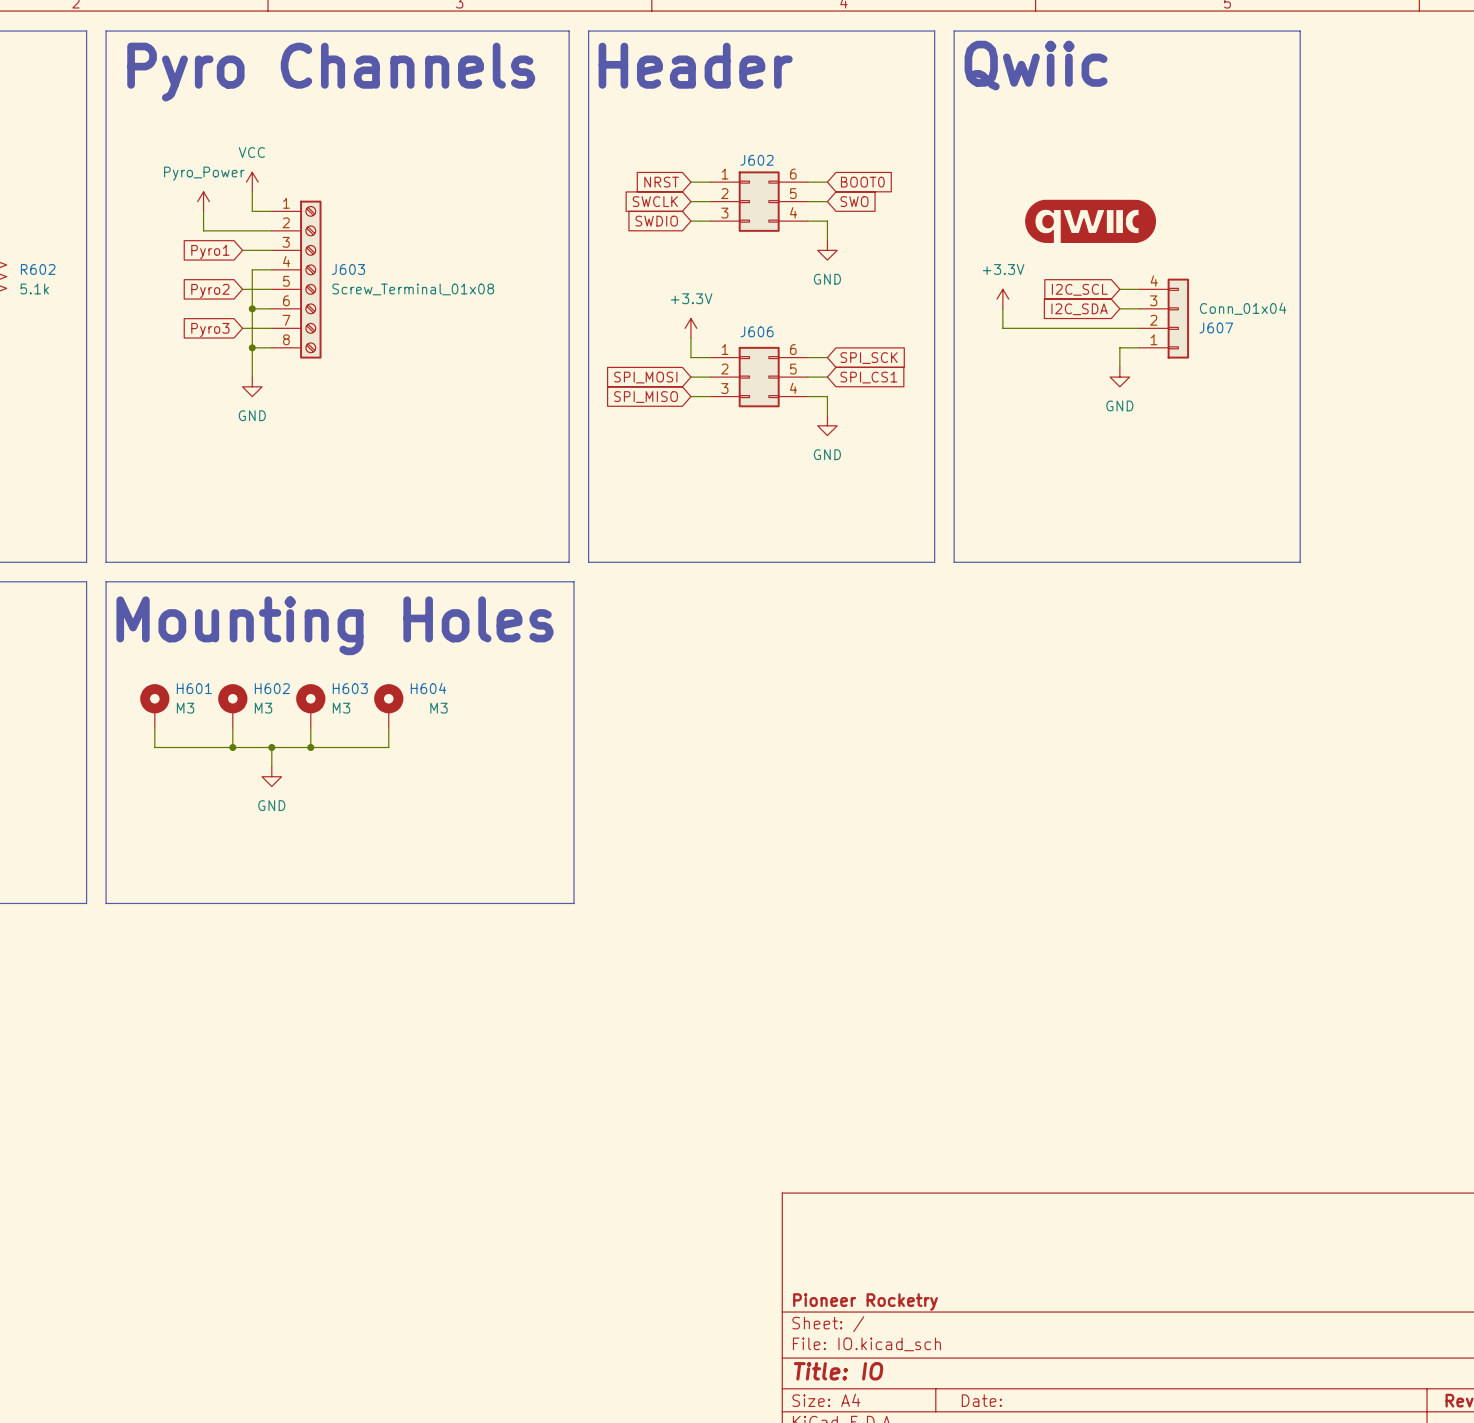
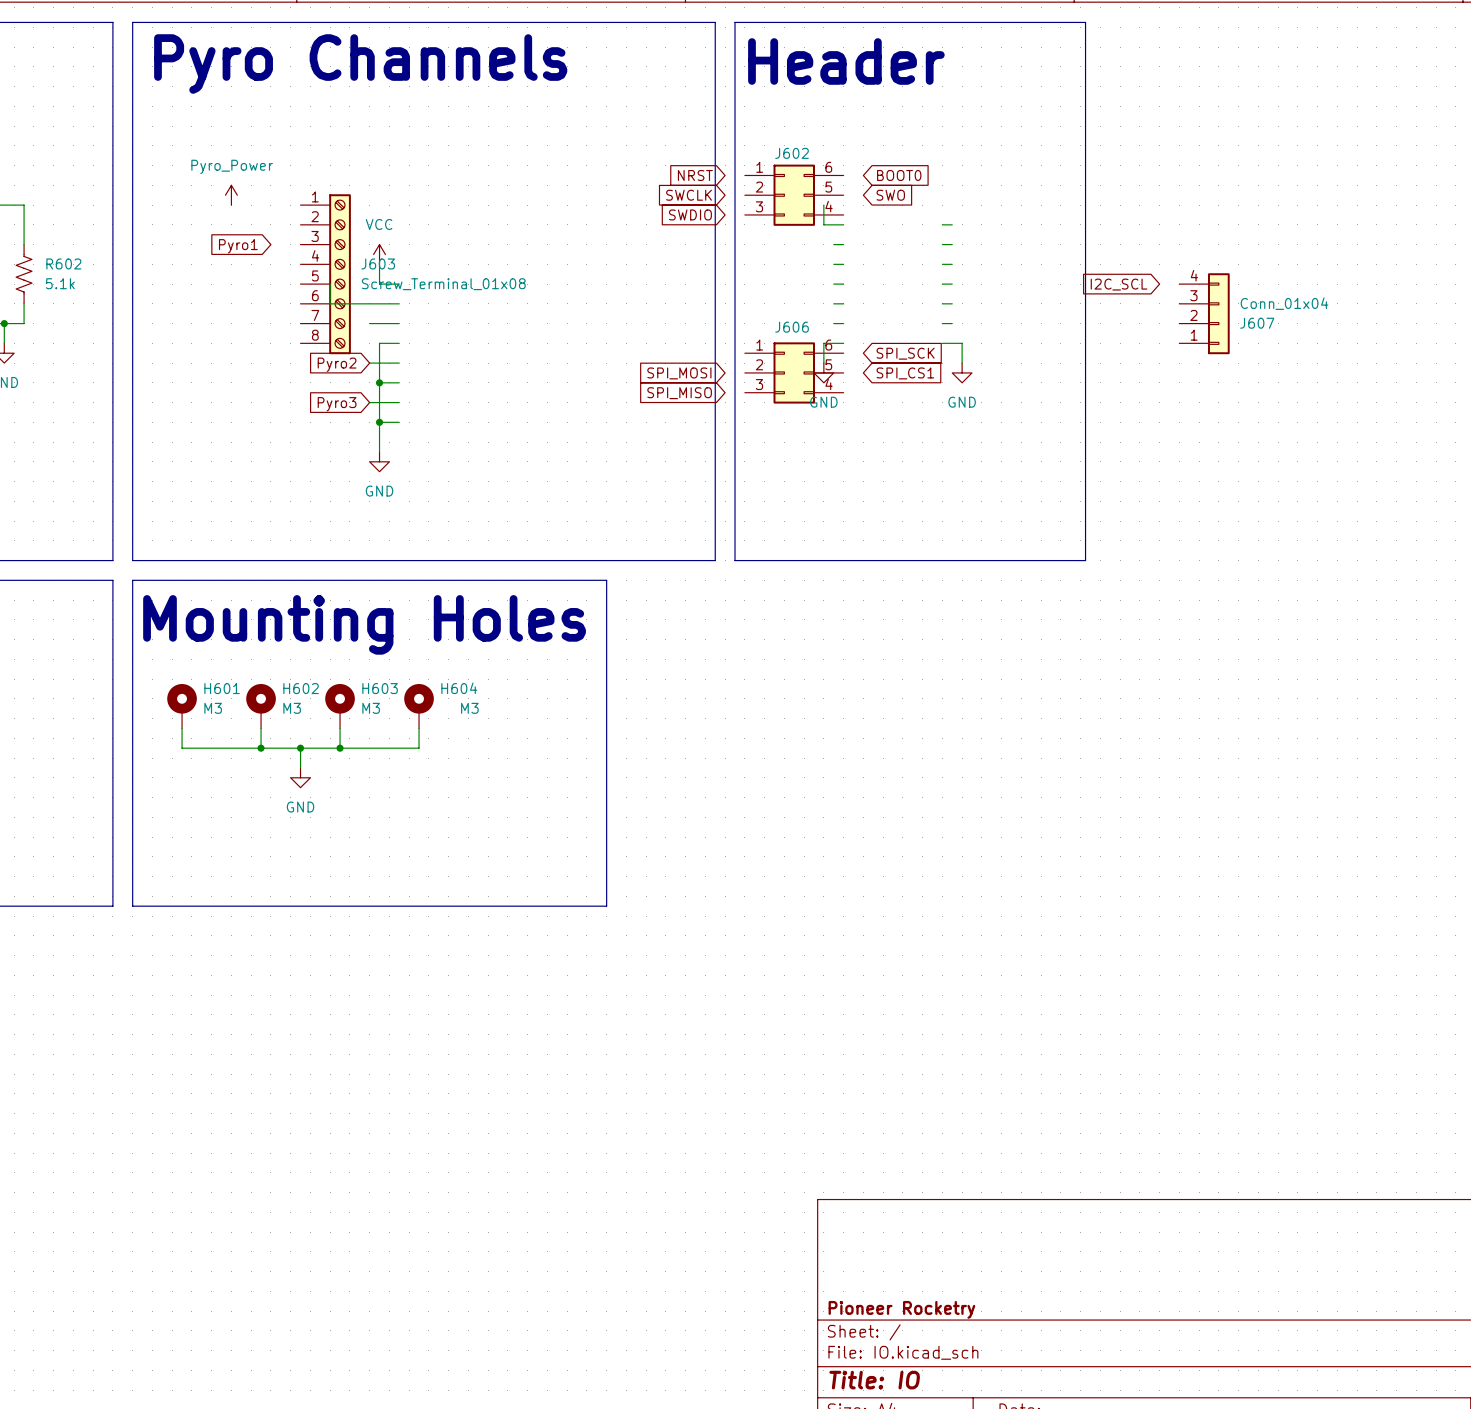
line: (569, 31) (569, 562) -> (601, 22) (621, 22)
line: (588, 31) (588, 562) -> (601, 560) (621, 560)
line: (681, 31) (700, 31) -> (715, 22) (715, 560)
line: (934, 31) (934, 562) -> (971, 22) (991, 22)
line: (954, 31) (954, 562) -> (971, 560) (991, 560)
line: (1046, 31) (1300, 31) (1300, 562) (1046, 562) -> (1085, 22) (1085, 560)
text position: Header (695, 65) -> Header (846, 61)
text: Qwiic (1036, 65) -> none
power symbol position: VCC (252, 182) -> VCC (379, 254)
wire: (690, 182) (710, 182) -> none
wire: (807, 182) (827, 182) -> none
wire: (252, 191) (252, 211) (271, 211) -> (379, 264) (379, 284) (399, 284)
wire: (690, 201) (710, 201) -> none
wire: (807, 201) (827, 201) -> none
wire: (203, 211) (203, 230) (271, 230) -> (330, 284) (330, 303) (399, 303)
wire: (690, 221) (710, 221) -> none
wire: (807, 221) (827, 221) (827, 240) -> none
part: (1090, 221) -> none
wire: none -> (942, 224) (952, 224)
wire: (242, 250) (271, 250) -> (369, 323) (399, 323)
wire: none -> (833, 244) (843, 244)
power symbol: GND (827, 250) -> none
wire: none -> (942, 244) (952, 244)
wire: (271, 269) (252, 269) (252, 377) -> (399, 343) (379, 343) (379, 451)
wire: none -> (833, 264) (843, 264)
wire: none -> (942, 264) (952, 264)
wire: (242, 289) (271, 289) -> (369, 363) (399, 363)
wire: none -> (833, 284) (843, 284)
wire: none -> (942, 284) (952, 284)
wire: (1119, 289) (1139, 289) -> none
global label position: Pyro2 (210, 290) -> Pyro2 (337, 364)
power symbol: +3.3V (1002, 299) -> none
wire: (252, 308) (271, 308) -> (379, 382) (399, 382)
junction: (252, 308) -> none
wire: none -> (833, 303) (843, 303)
wire: none -> (942, 303) (952, 303)
wire: (1002, 308) (1002, 328) (1139, 328) -> none
wire: (1119, 308) (1139, 308) -> none
global label: I2C_SDA (1079, 309) -> none
wire: (242, 328) (271, 328) -> (369, 402) (399, 402)
power symbol: +3.3V (690, 328) -> none
wire: none -> (833, 323) (843, 323)
wire: none -> (942, 323) (952, 323)
global label position: Pyro3 (210, 329) -> Pyro3 (337, 404)
wire: (690, 338) (690, 357) (710, 357) -> (823, 205) (823, 224) (843, 224)
wire: (252, 347) (271, 347) -> (379, 422) (399, 422)
junction: (252, 347) -> none
wire: none -> (843, 343) (823, 343) (823, 363)
wire: (1139, 347) (1119, 347) (1119, 367) -> none
wire: (807, 357) (827, 357) -> none
wire: (690, 377) (710, 377) -> none
power symbol: none -> GND (823, 372)
wire: (807, 377) (827, 377) -> none
power symbol: none -> GND (962, 372)
power symbol: GND (1119, 377) -> none
power symbol position: GND (252, 386) -> GND (379, 461)
junction: none -> (379, 382)
wire: (690, 396) (710, 396) -> none
wire: (807, 396) (827, 396) (827, 416) -> (942, 343) (962, 343) (962, 363)
junction: none -> (379, 422)
power symbol: GND (827, 425) -> none
line: (681, 562) (700, 562) -> (735, 22) (735, 560)

